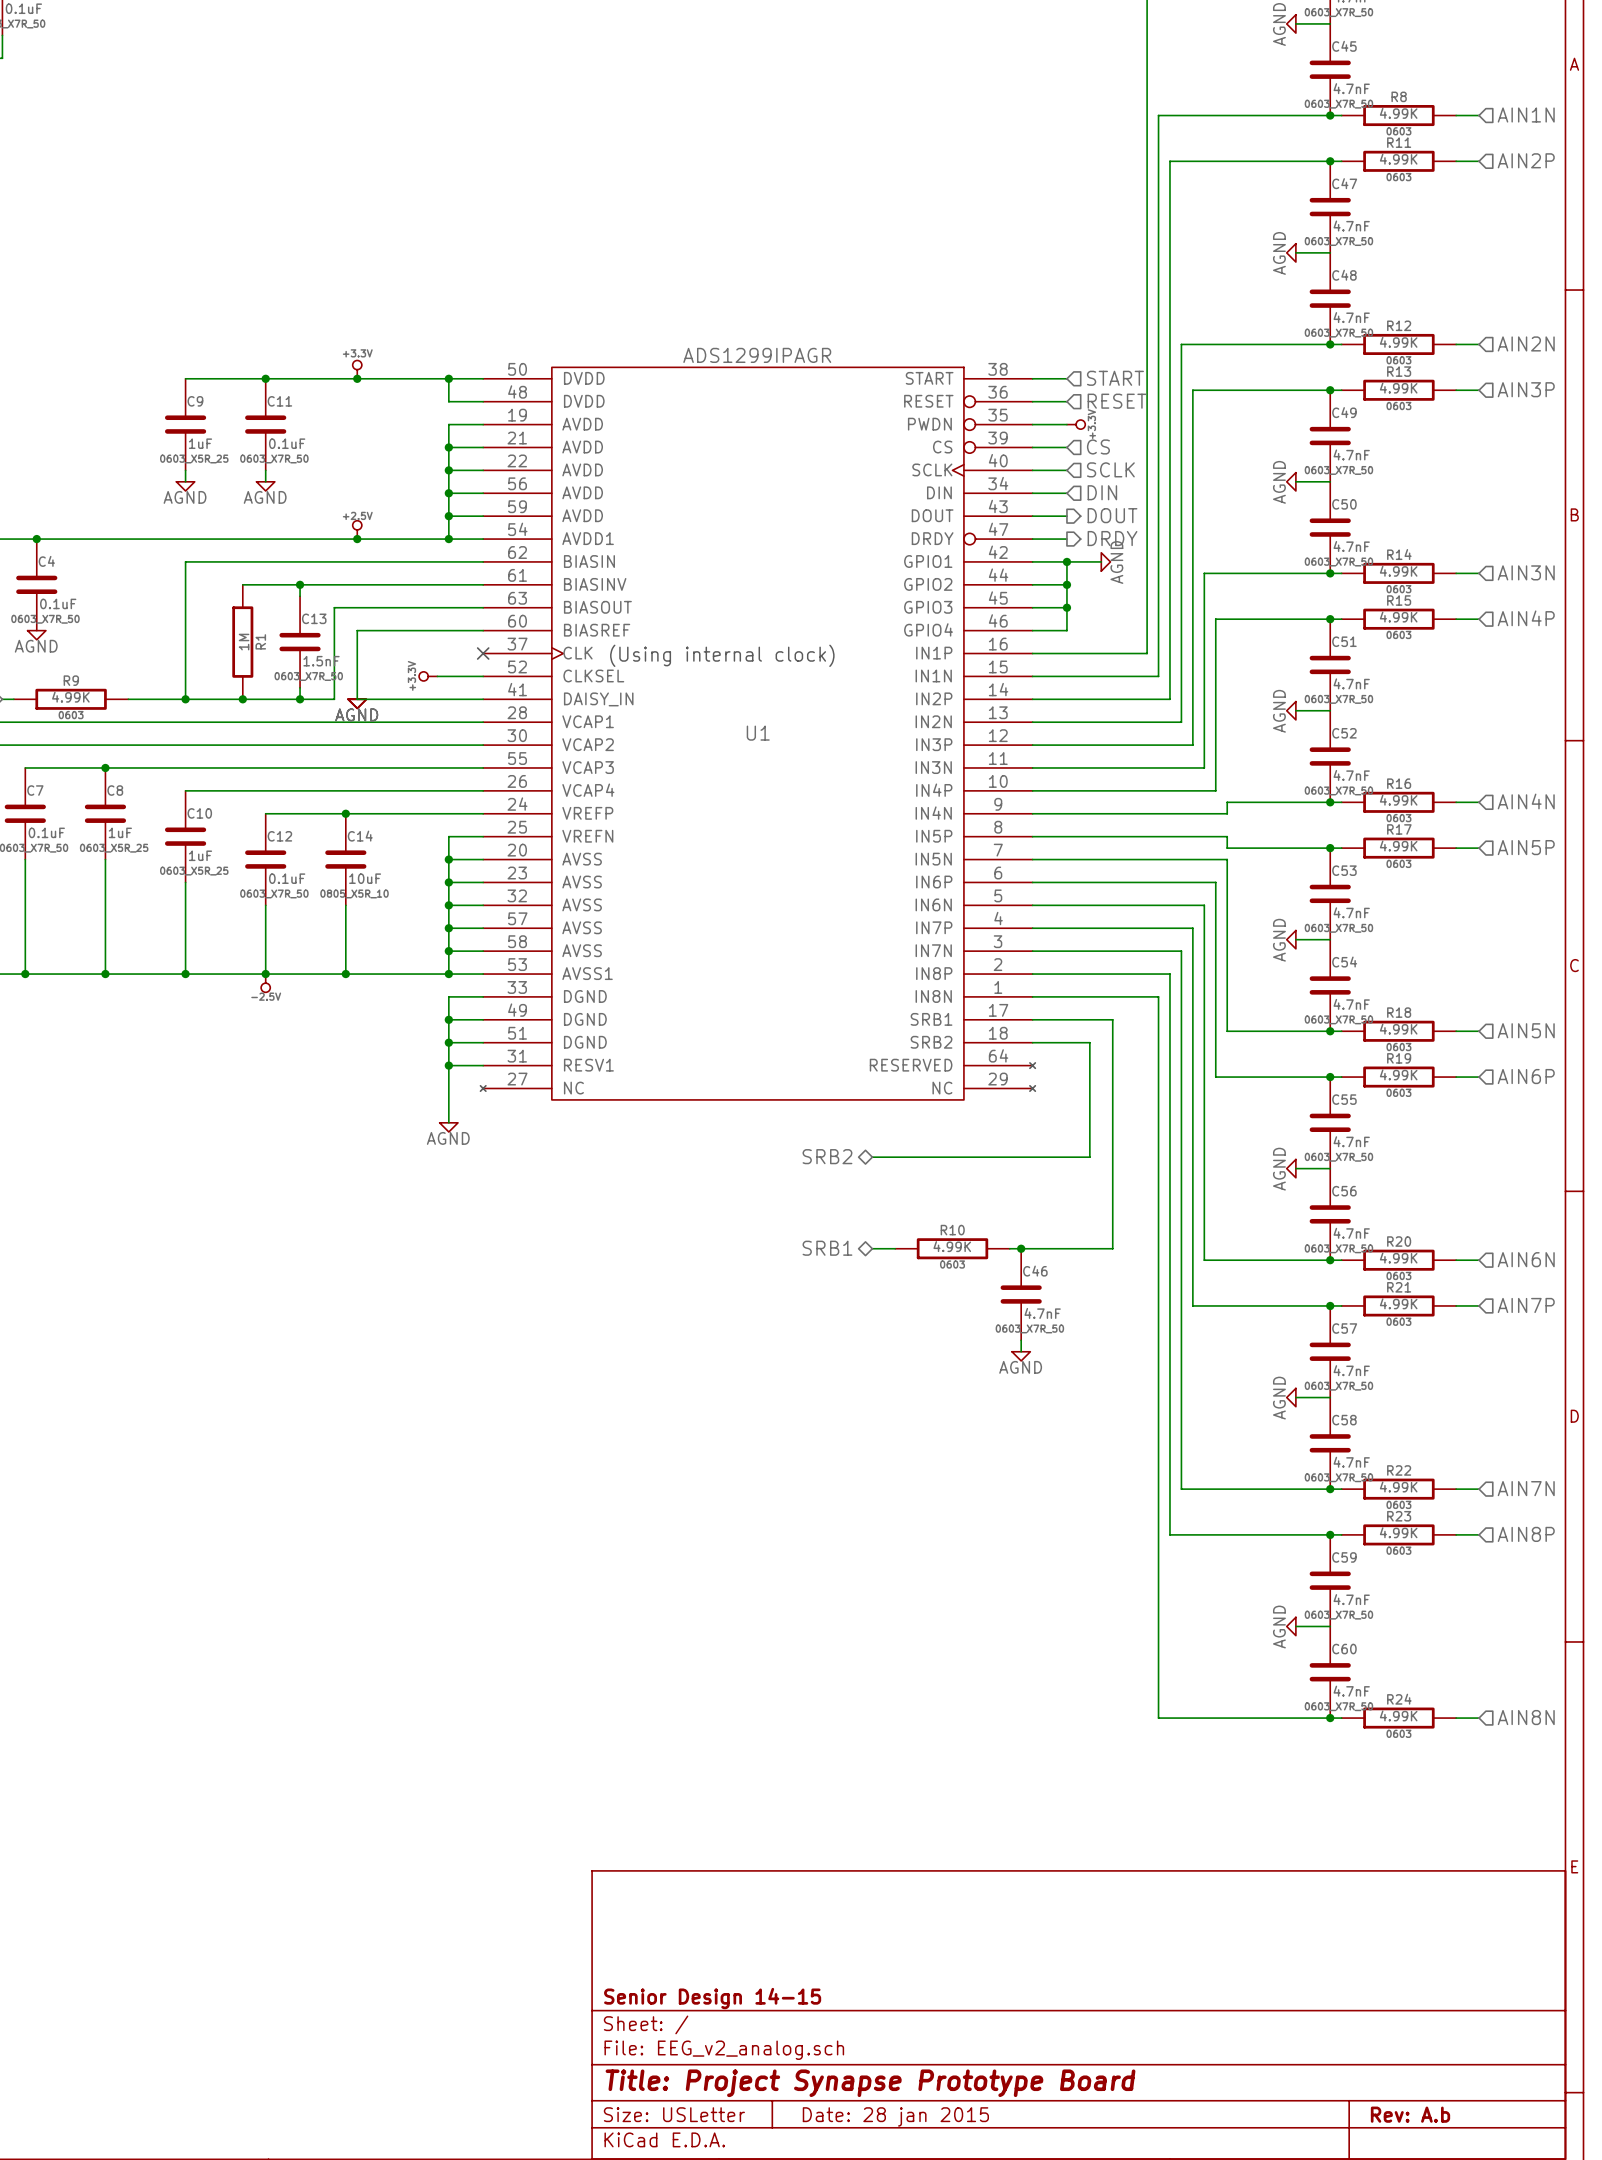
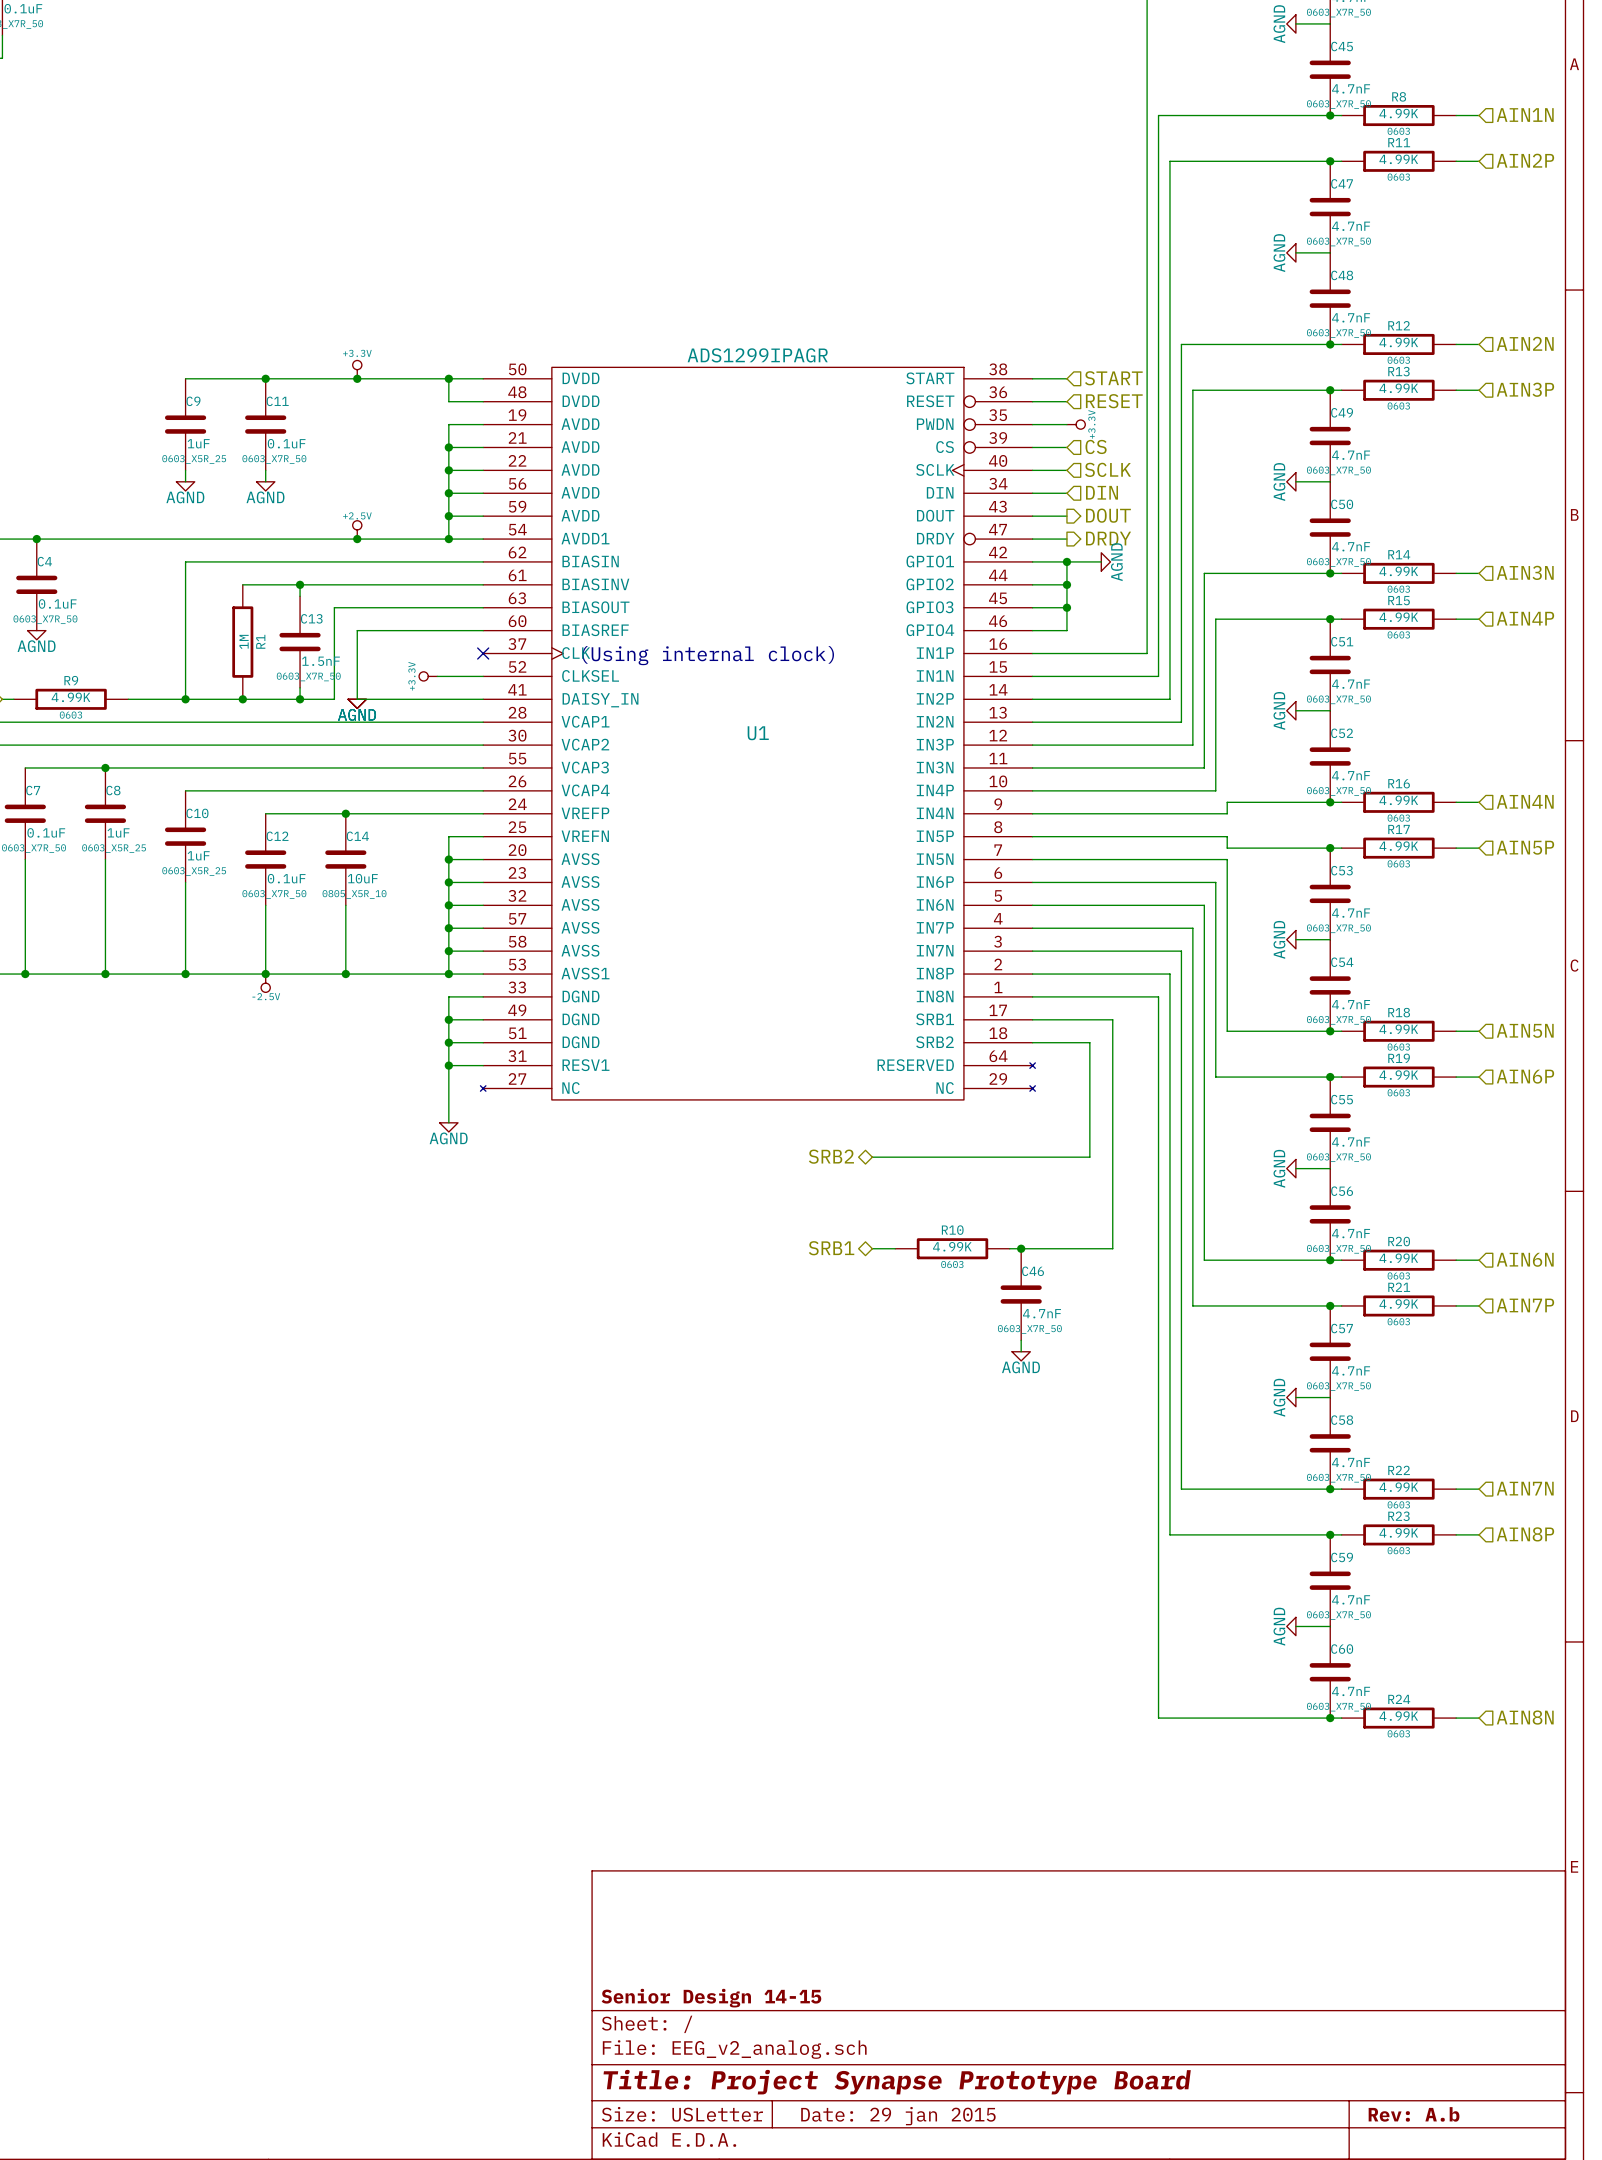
title block: Date: 28 jan 2015 (895, 2116) -> Date: 29 jan 2015 (898, 2116)

